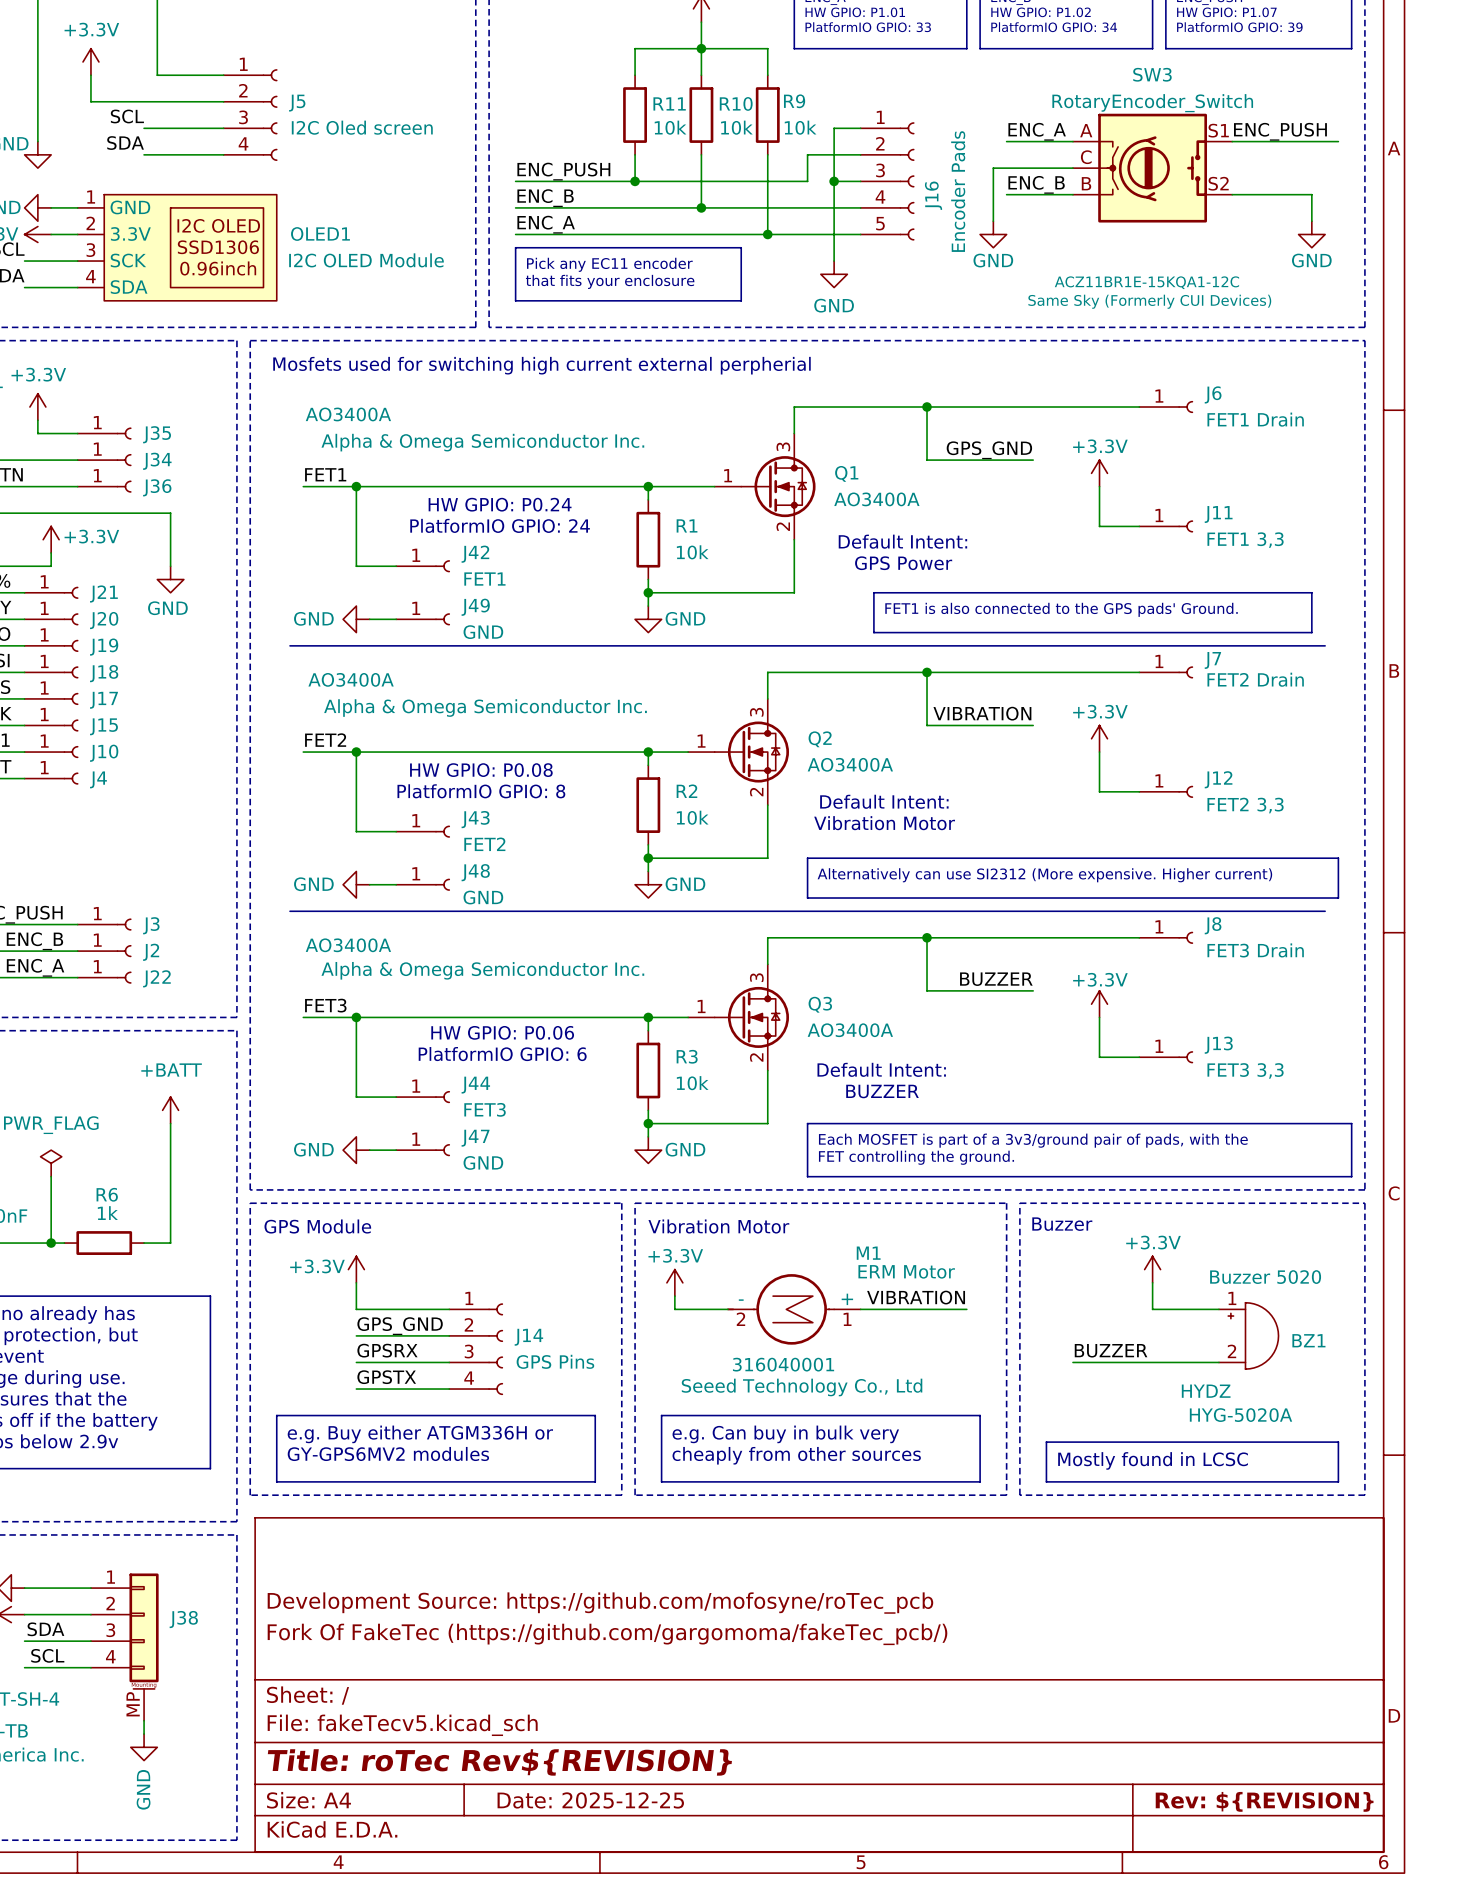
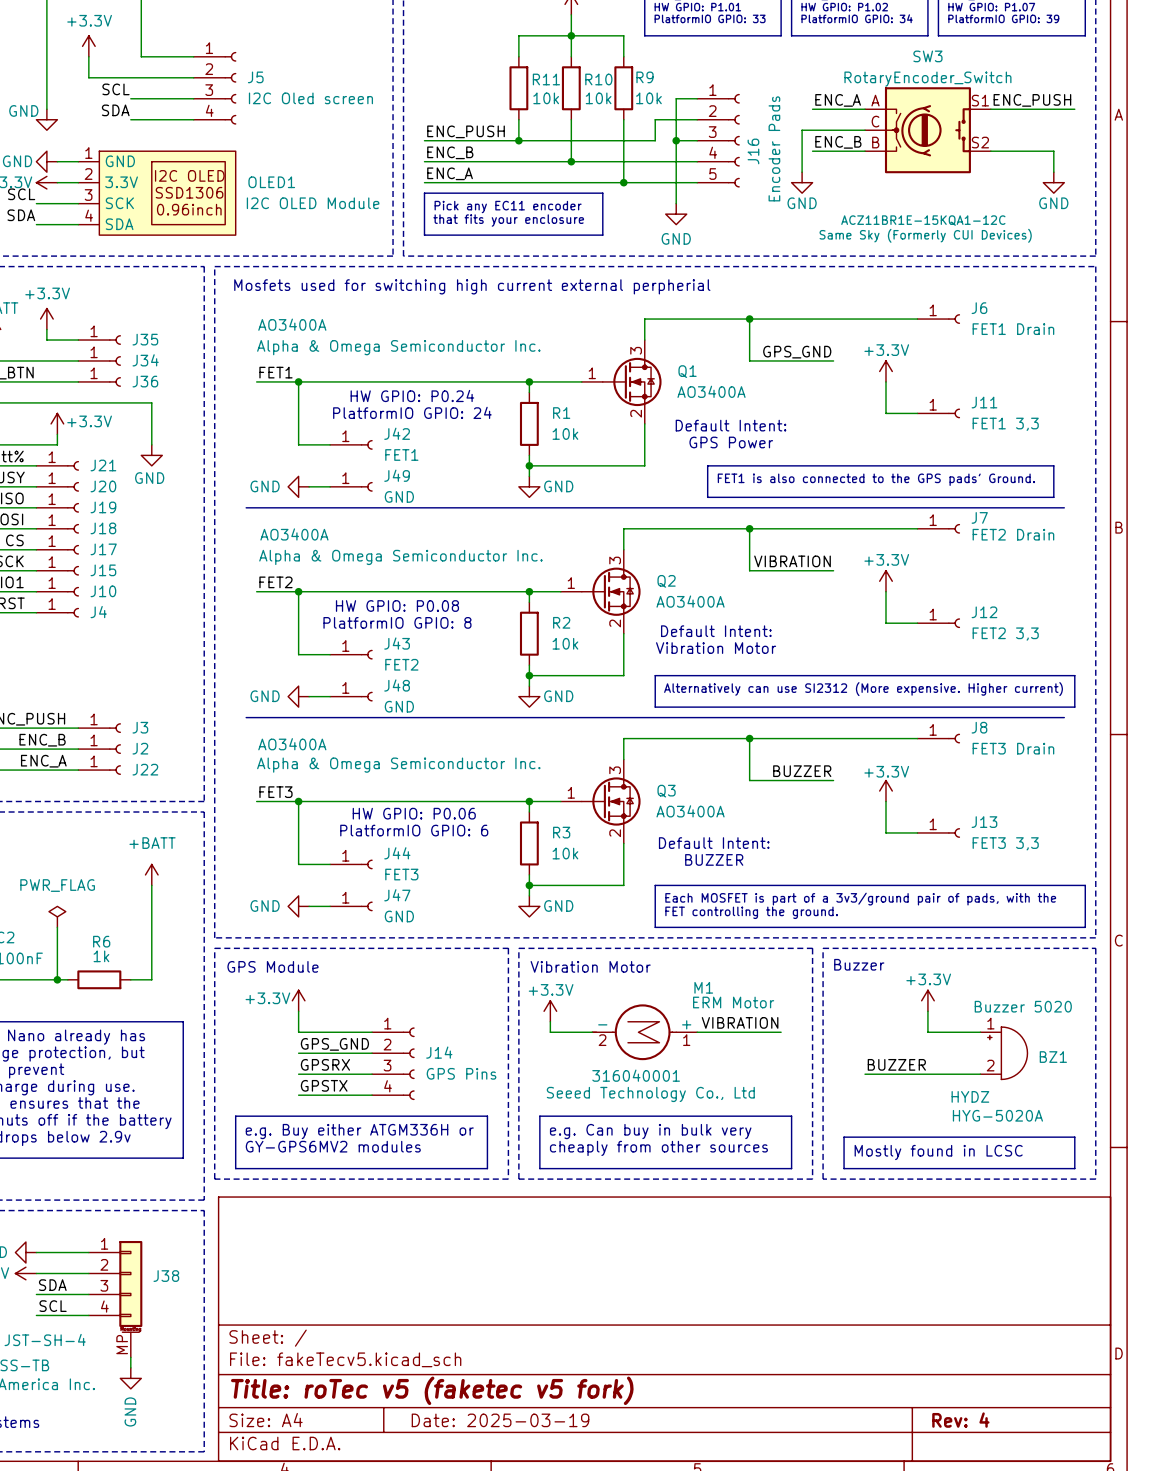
title block: Development Source: https://github.com/mofosyne/roTec_pcb (600, 1603) -> none
title block: Fork Of FakeTec (https://github.com/gargomoma/fakeTec_pcb/) (607, 1634) -> none
title block: Title: roTec Rev${REVISION} (499, 1762) -> Title: roTec v5 (faketec v5 fork) (432, 1390)
title block: Date: 2025-12-25 (590, 1800) -> Date: 2025-03-19 (500, 1420)
title block: Rev: ${REVISION} (1264, 1801) -> Rev: 4 (960, 1420)

